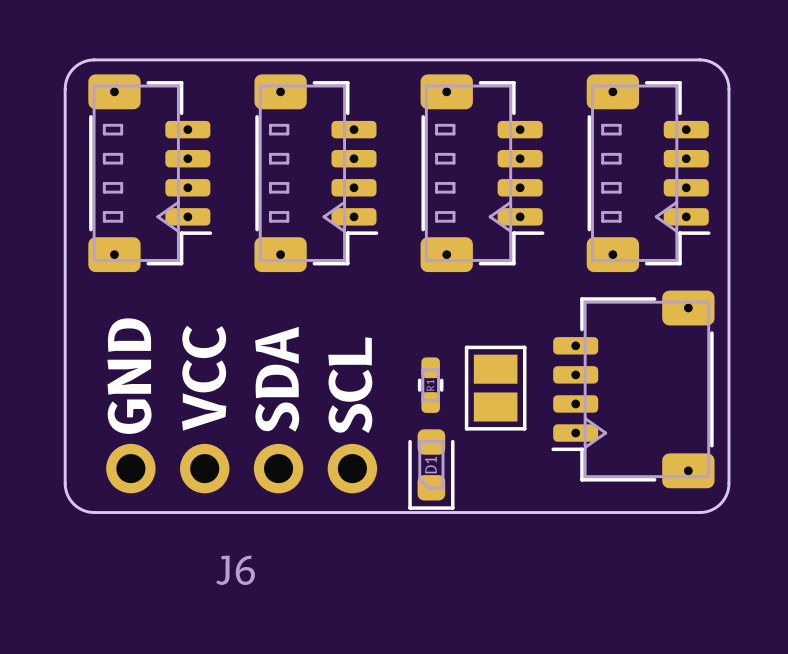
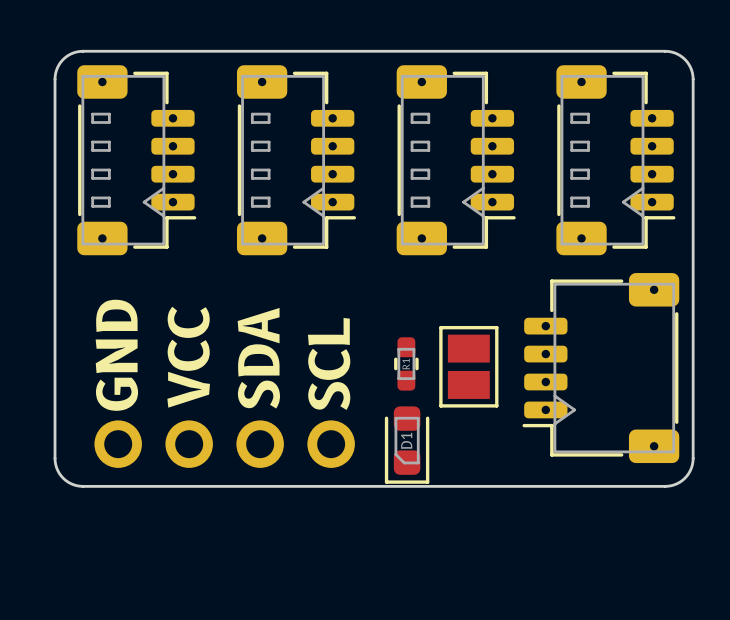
J6 name: J6 (235, 570) -> none

